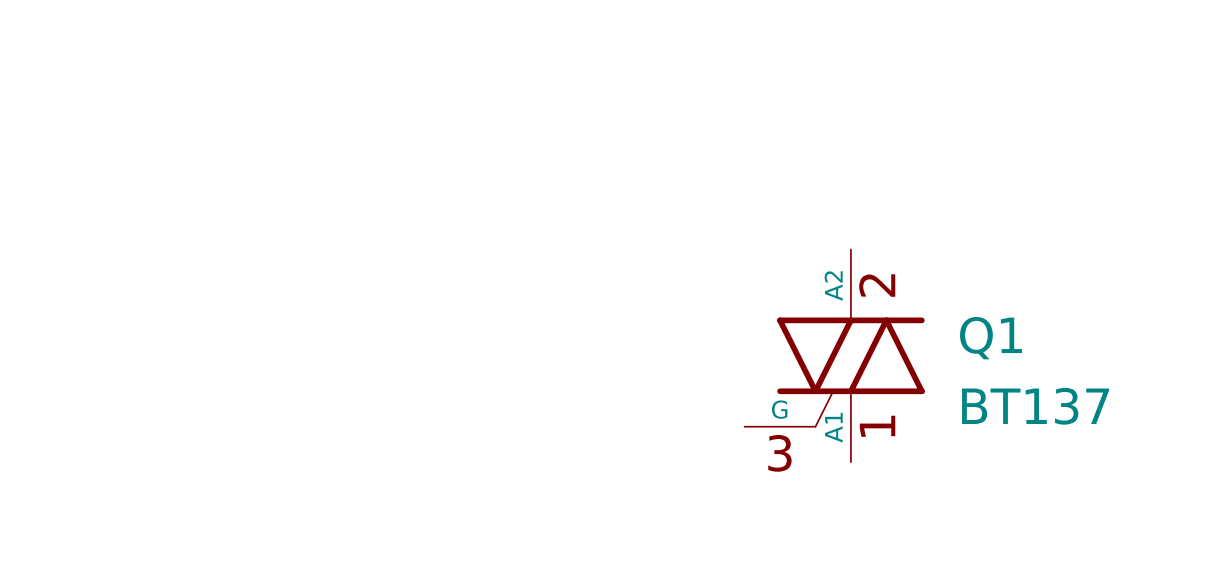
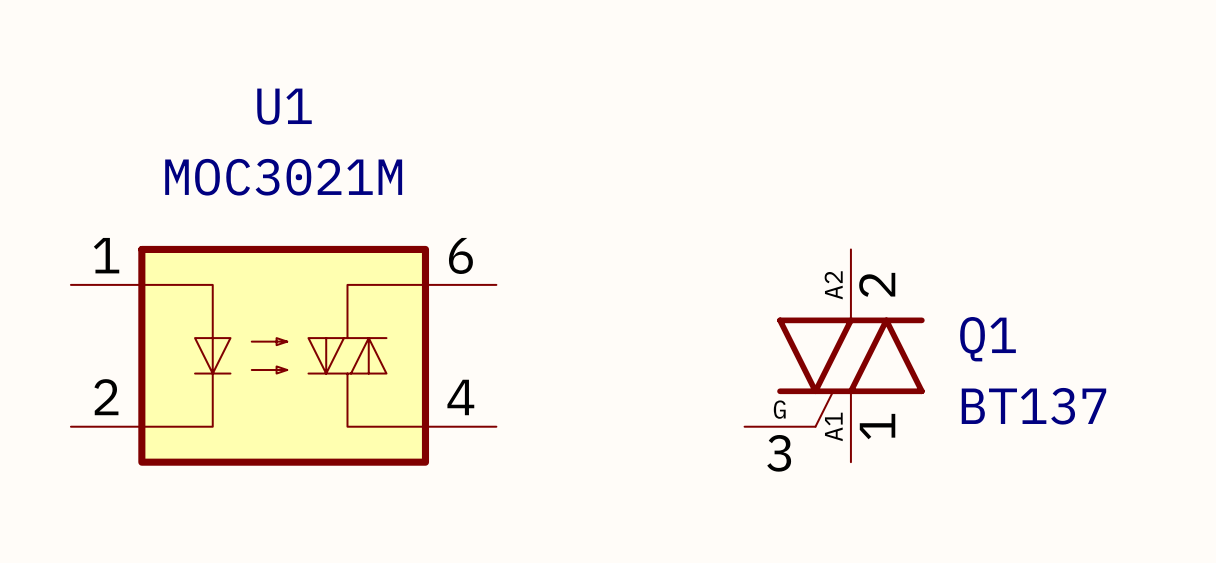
U1: none -> MOC3021M (283, 355)

